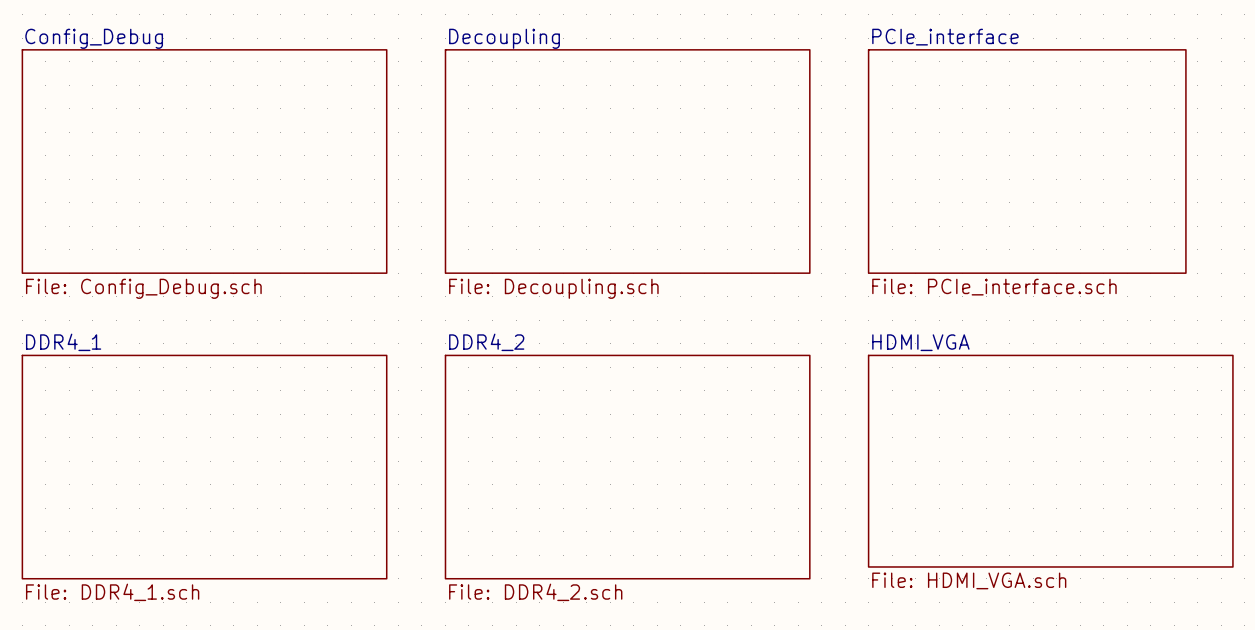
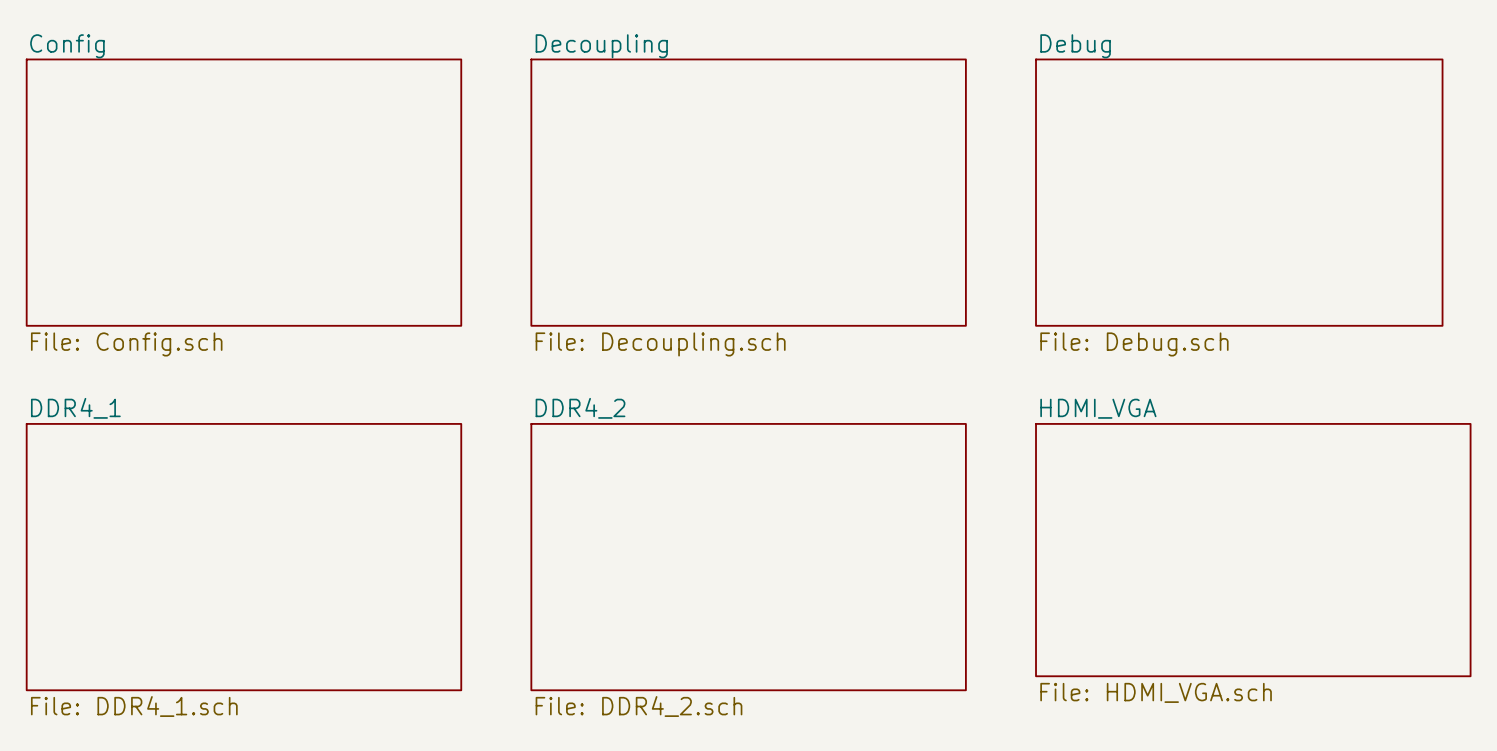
sheet Config_Debug name: Config_Debug (94, 38) -> Config (67, 46)
sheet PCIe_interface: File: PCIe_interface.sch (1027, 161) -> none
sheet Debug: none -> File: Debug.sch (1239, 192)
sheet Config_Debug value: File: Config_Debug.sch (143, 288) -> File: Config.sch (126, 344)

